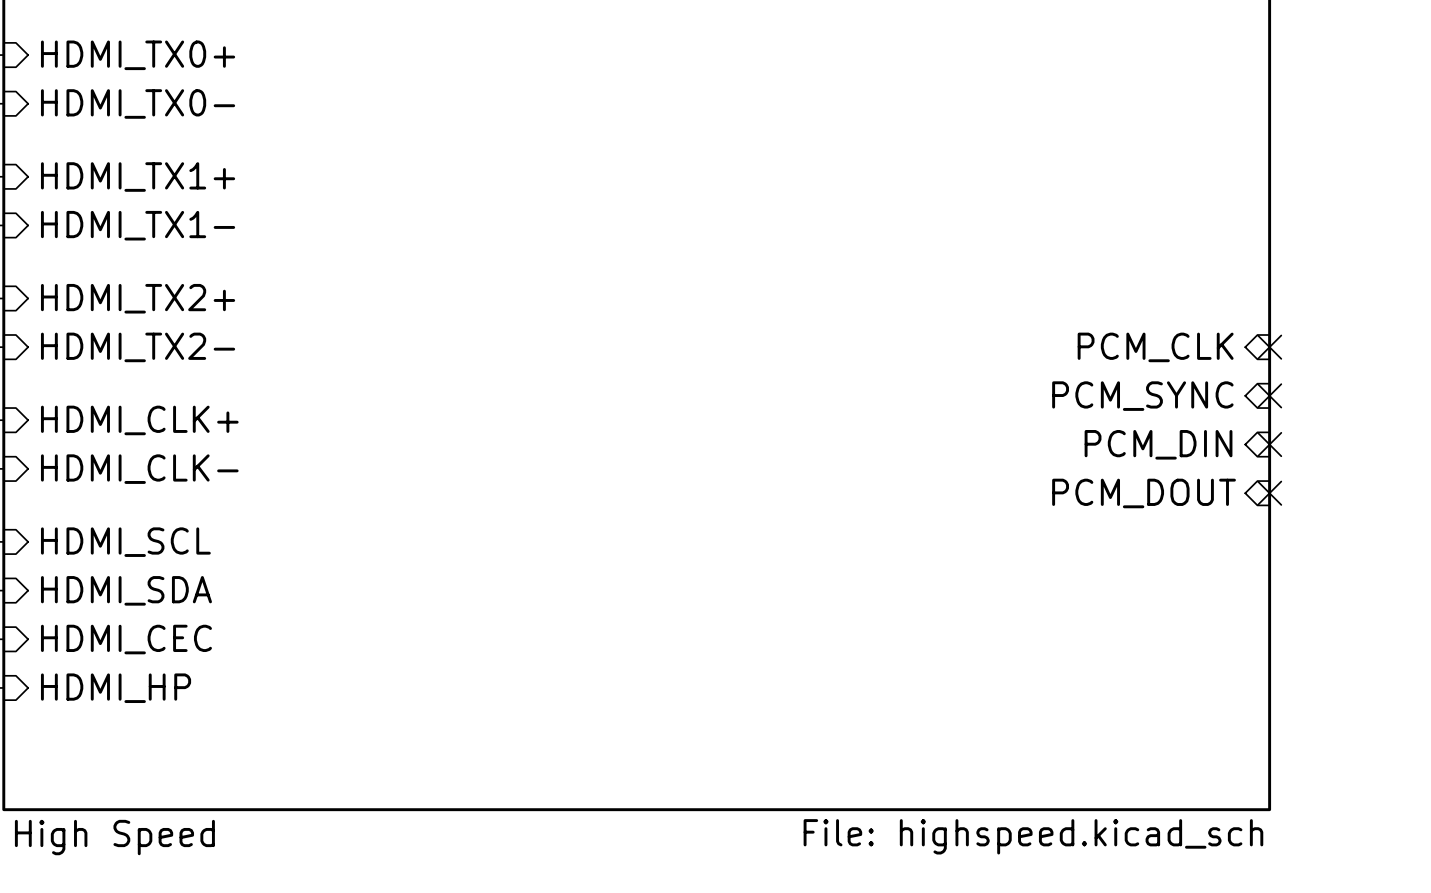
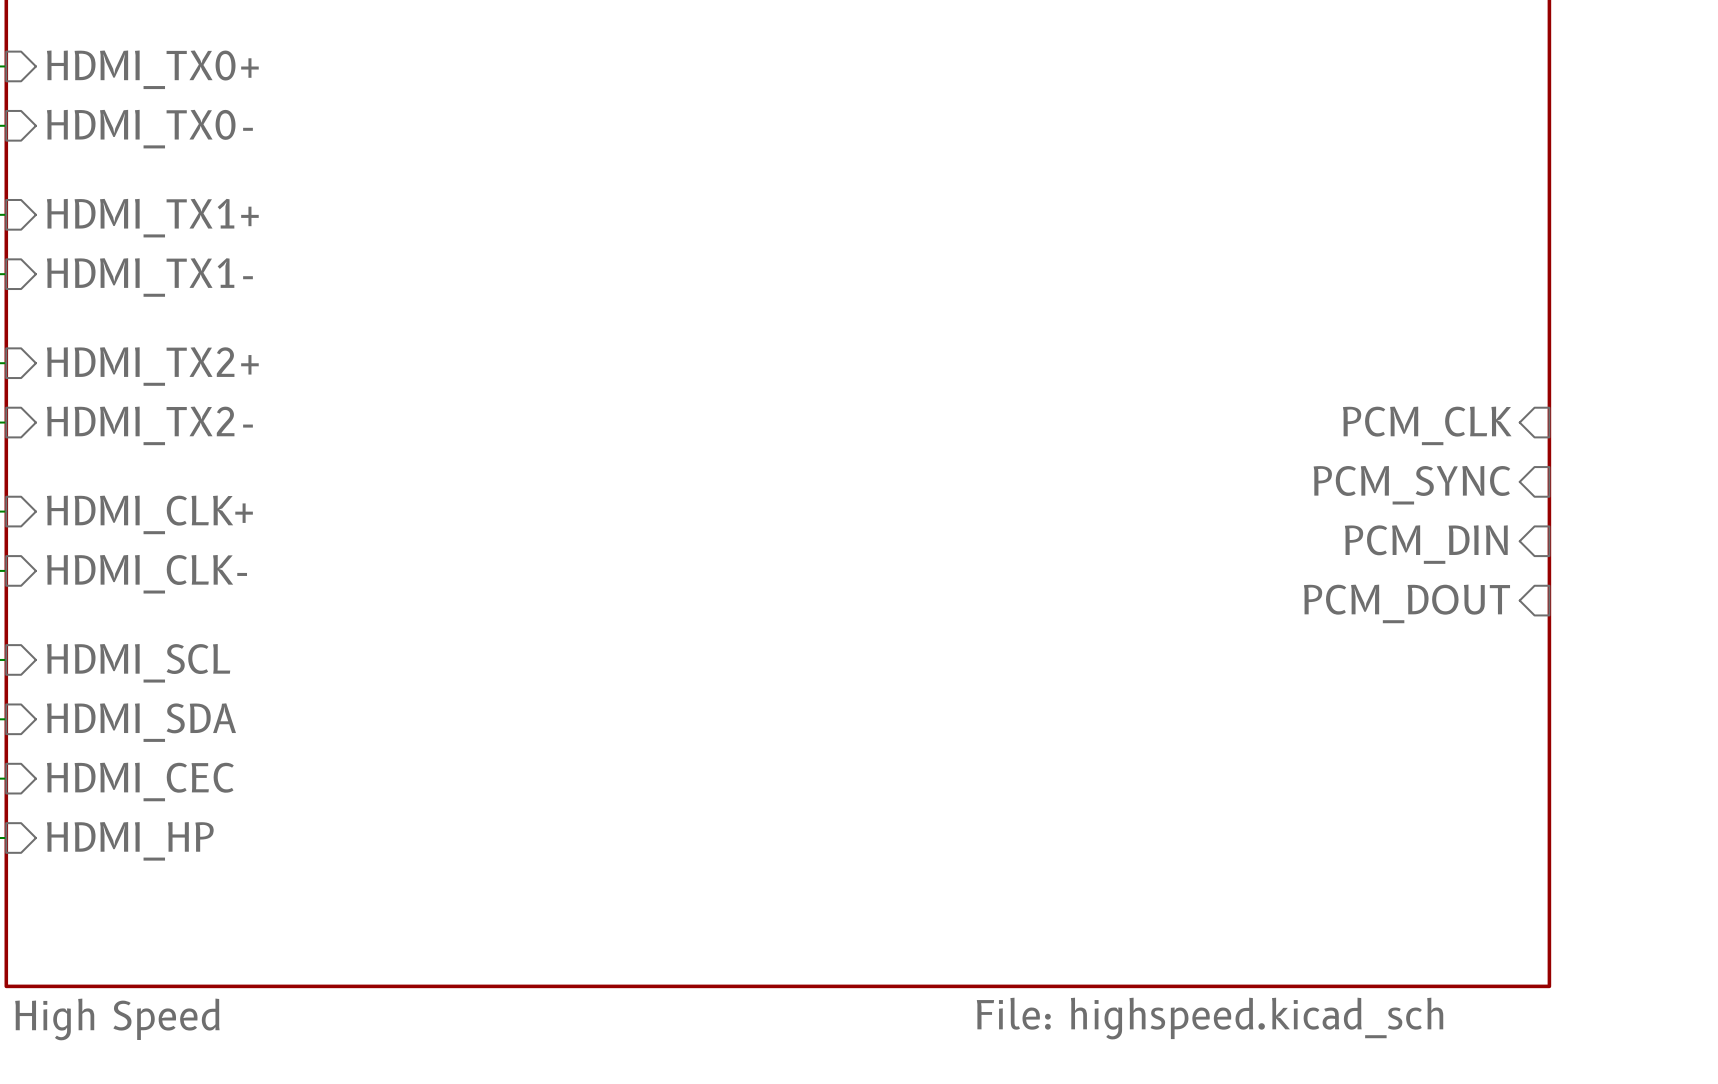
no-connect mark: (1269, 347) -> none
no-connect mark: (1269, 395) -> none
no-connect mark: (1269, 444) -> none
no-connect mark: (1269, 493) -> none

